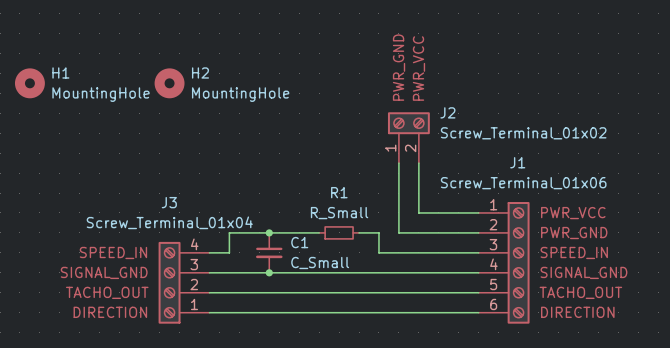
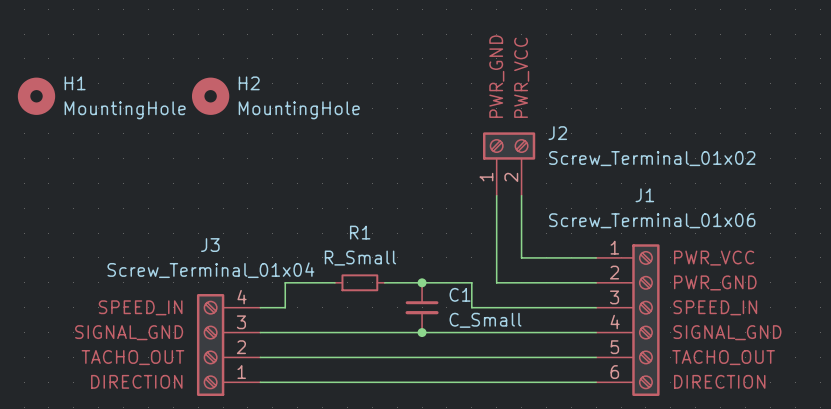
wire: (269, 232) (309, 232) -> (397, 282) (446, 282)
junction: (269, 232) -> none
junction: none -> (422, 282)
R1 position: (339, 232) -> (359, 282)
C1 position: (269, 252) -> (422, 307)
junction: (269, 272) -> none
junction: none -> (422, 332)

